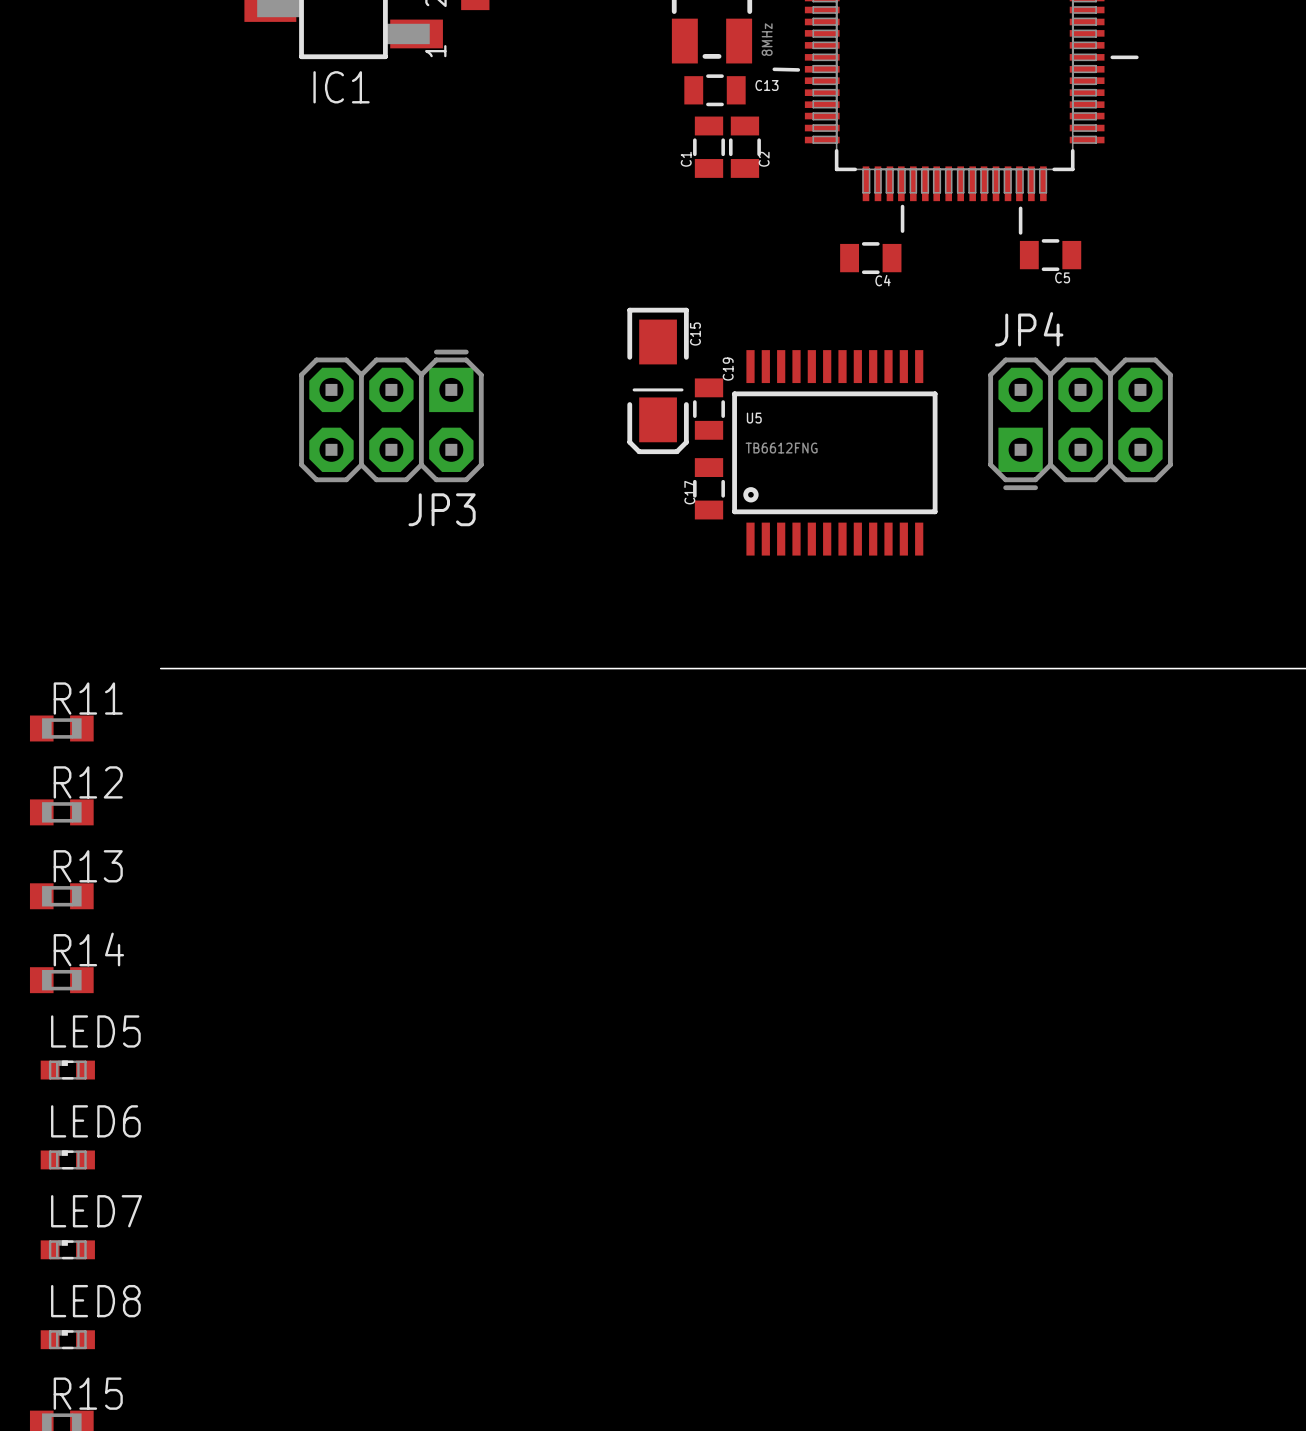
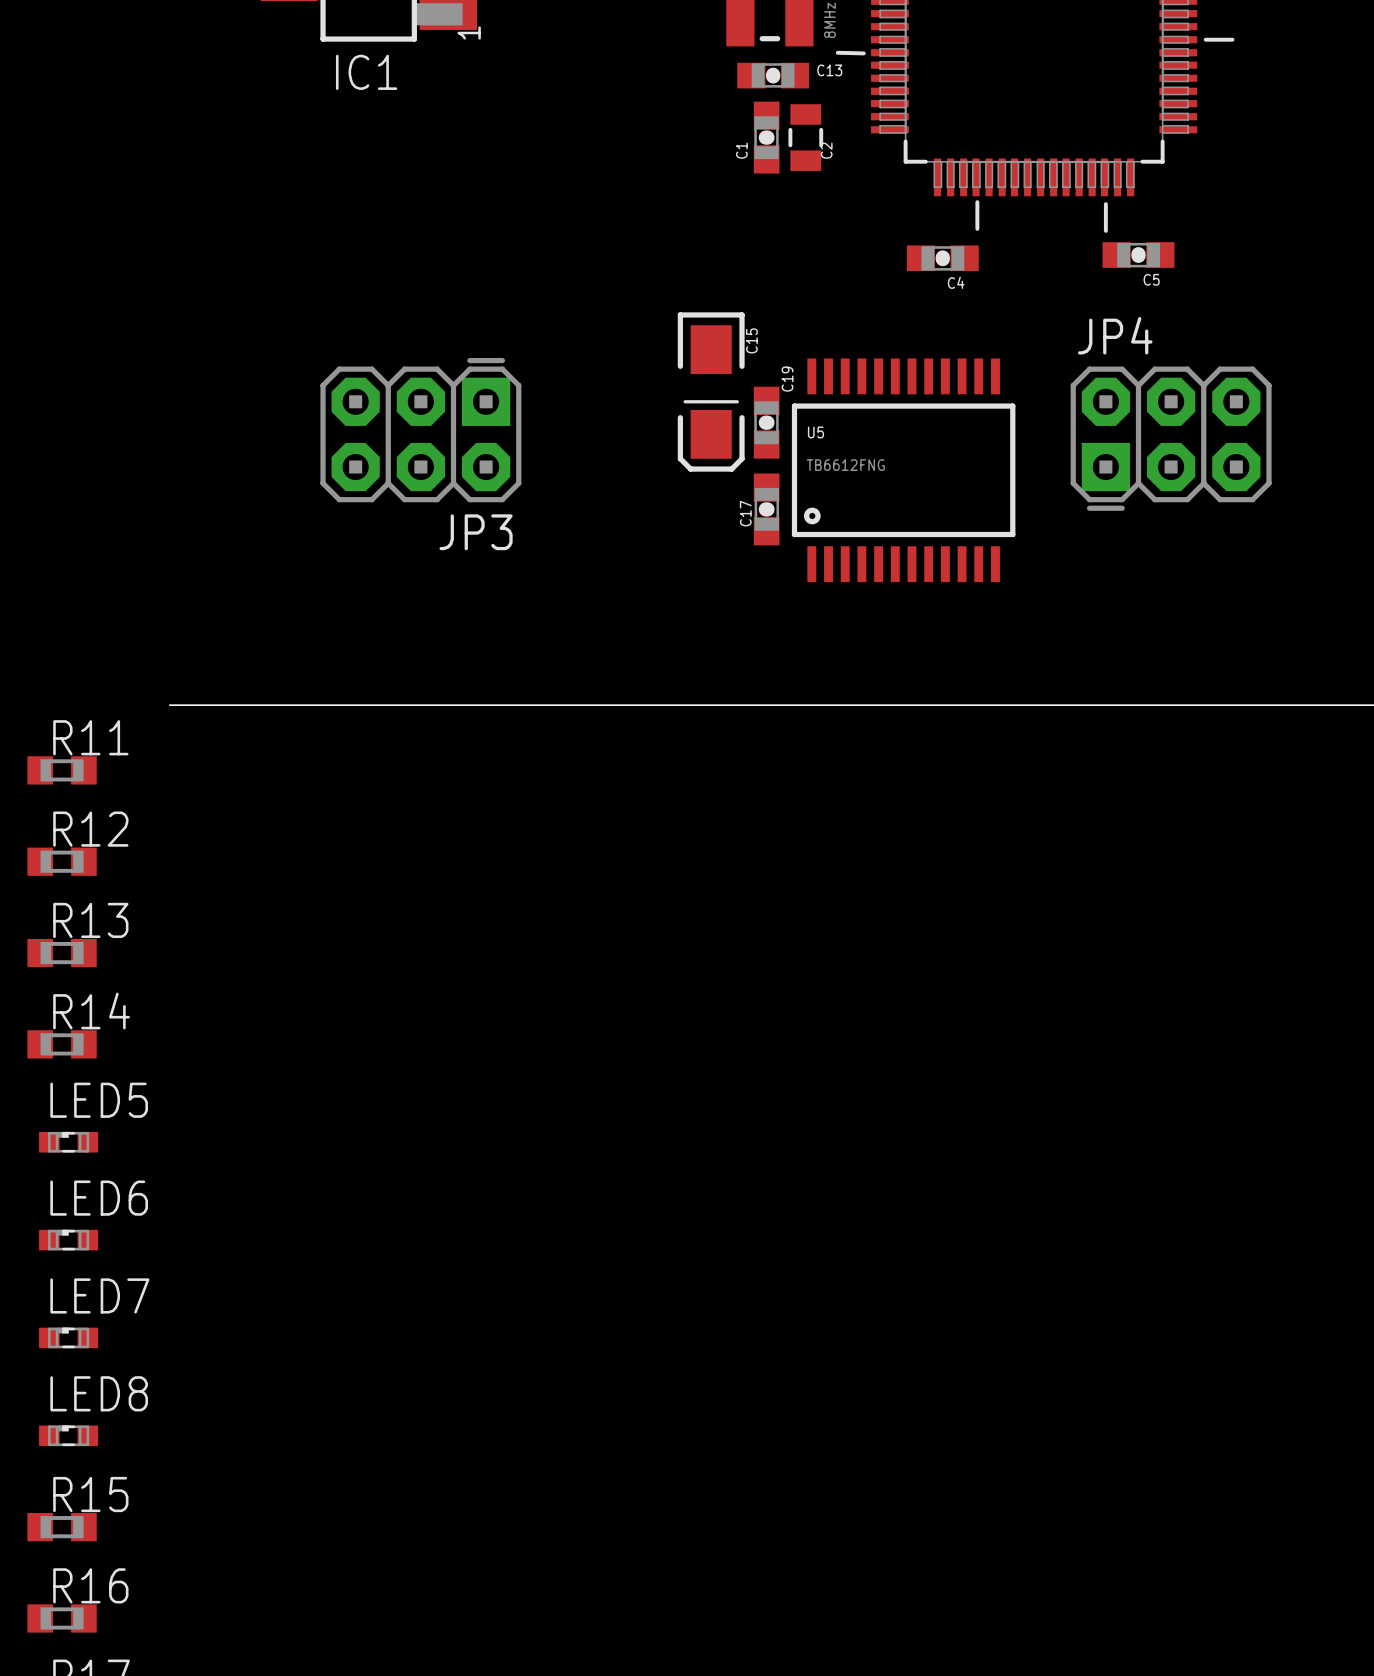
C13 footprint: [684, 74, 746, 107] -> [737, 62, 810, 89]
C1 footprint: [693, 116, 725, 178] -> [753, 101, 780, 174]
C5 footprint: [1019, 239, 1082, 272] -> [1102, 242, 1175, 268]
C4 footprint: [840, 242, 902, 275] -> [906, 245, 979, 272]
C19 footprint: [693, 378, 725, 440] -> [753, 386, 780, 459]
C17 footprint: [693, 458, 725, 520] -> [753, 473, 780, 546]

